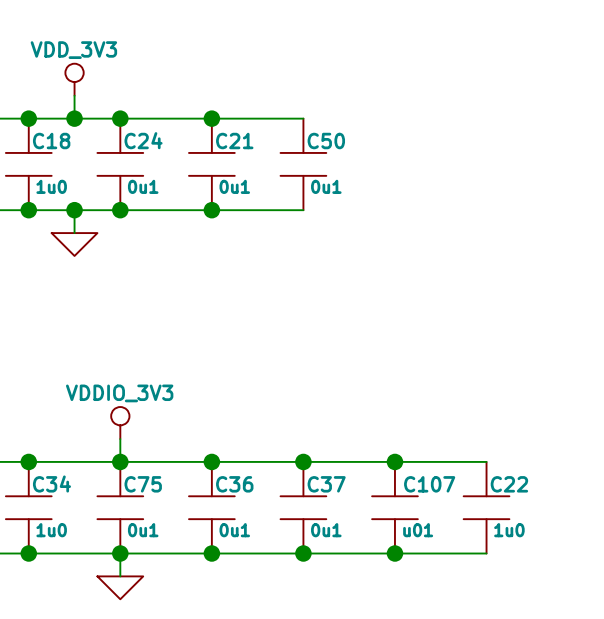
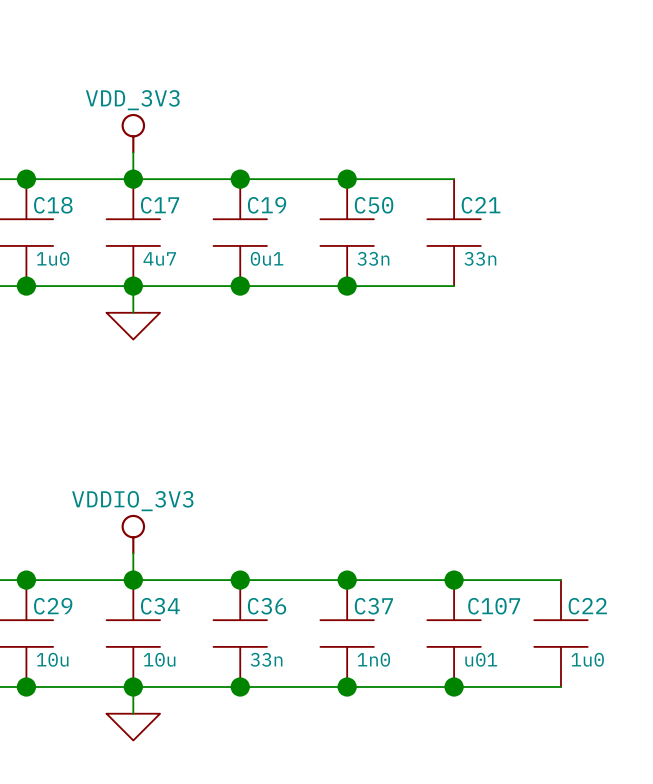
power symbol position: VDD_3V3 (74, 79) -> VDD_3V3 (133, 133)
wire: (74, 95) (74, 118) -> (133, 152) (133, 179)
junction: (74, 118) -> none
wire: none -> (347, 179) (454, 179)
junction: none -> (347, 179)
C24 name: C24 (143, 140) -> C17 (160, 205)
C21 name: C21 (234, 141) -> C19 (267, 205)
C21: none -> 33n (454, 232)
C24 value: 0u1 (143, 186) -> 4u7 (159, 258)
C50 value: 0u1 (326, 186) -> 33n (373, 258)
wire: (74, 210) (74, 233) -> (133, 286) (133, 312)
junction: (74, 210) -> none
wire: none -> (347, 286) (454, 286)
junction: none -> (347, 286)
power symbol position: (74, 244) -> (133, 326)
C34 name: C34 (51, 484) -> C29 (53, 606)
C75 name: C75 (143, 484) -> C34 (160, 606)
C34 value: 1u0 (51, 530) -> 10u (52, 659)
C75 value: 0u1 (143, 530) -> 10u (159, 659)
C36 value: 0u1 (234, 530) -> 33n (266, 659)
C37 value: 0u1 (326, 530) -> 1n0 (373, 659)

